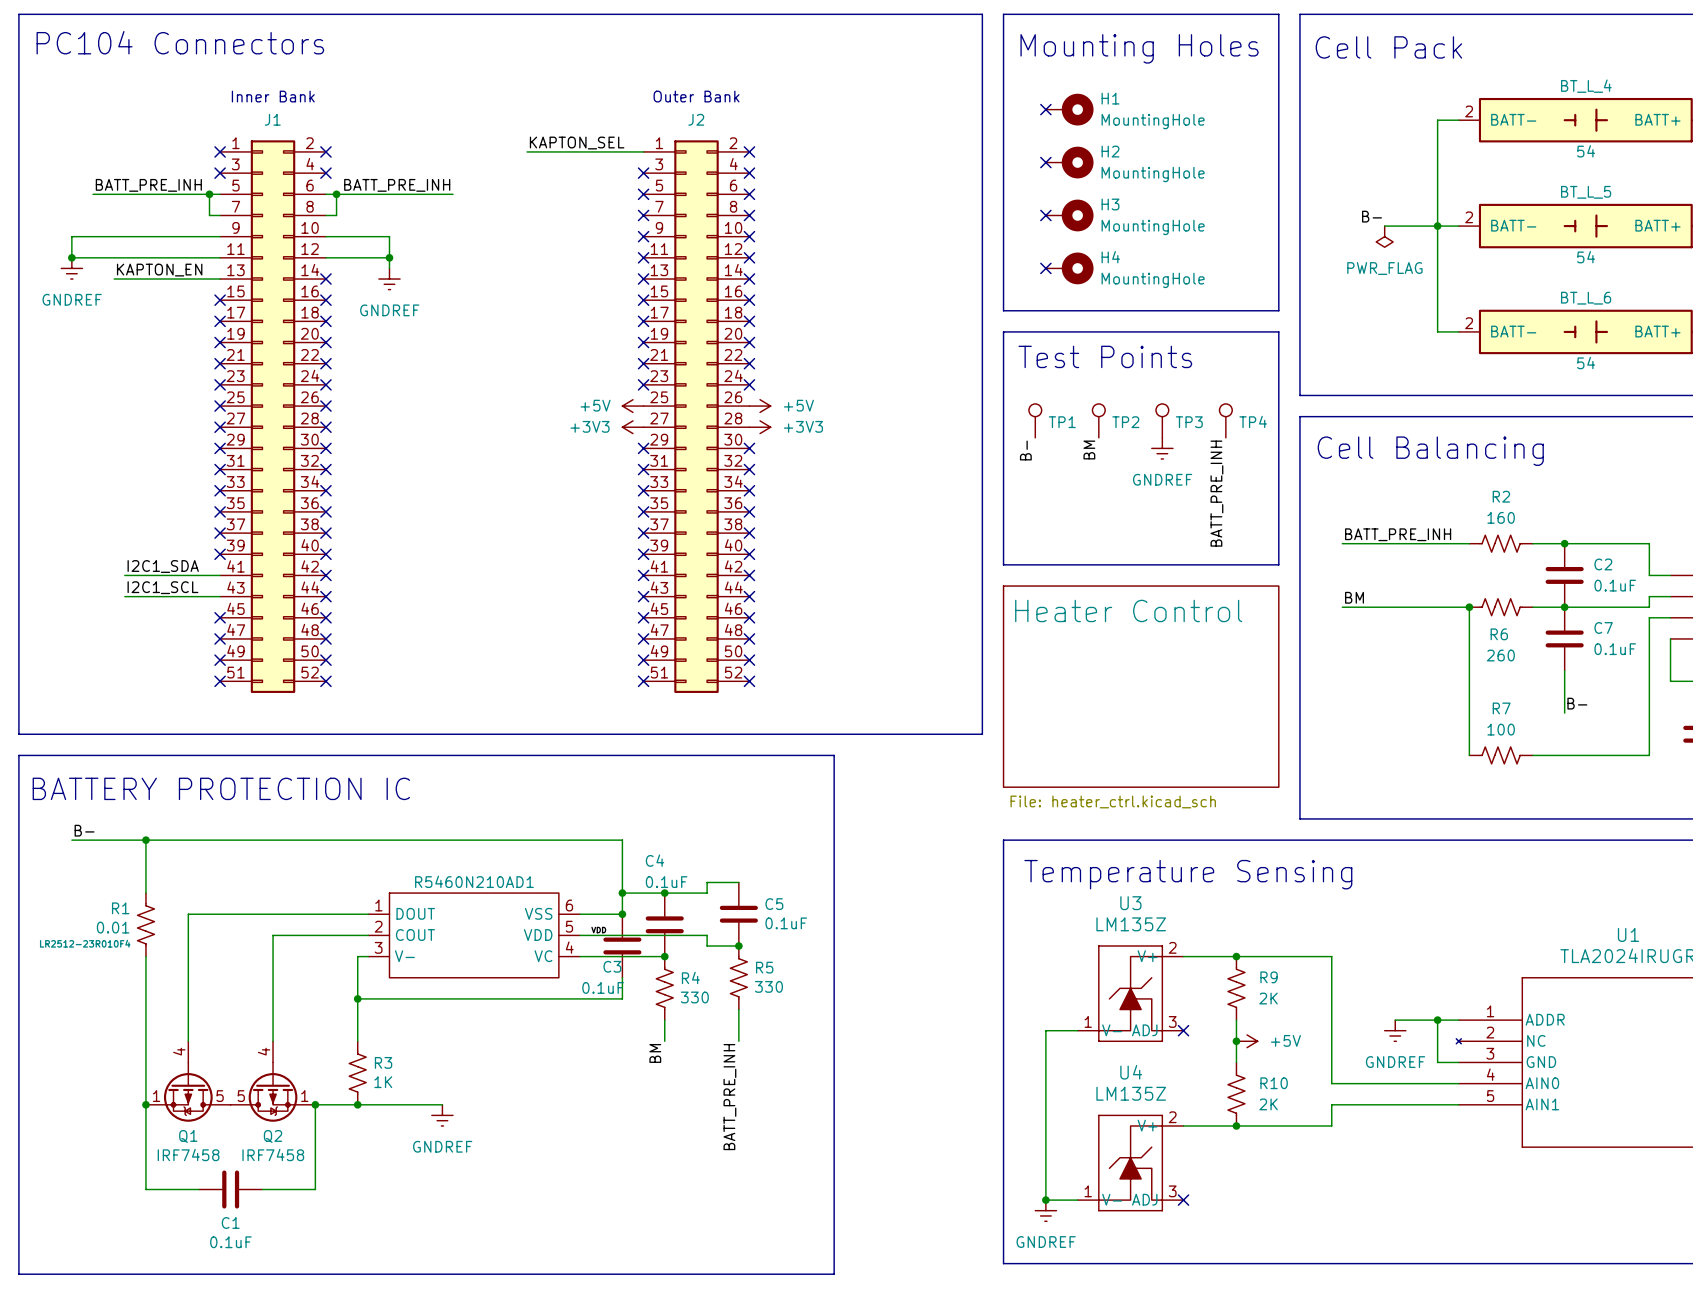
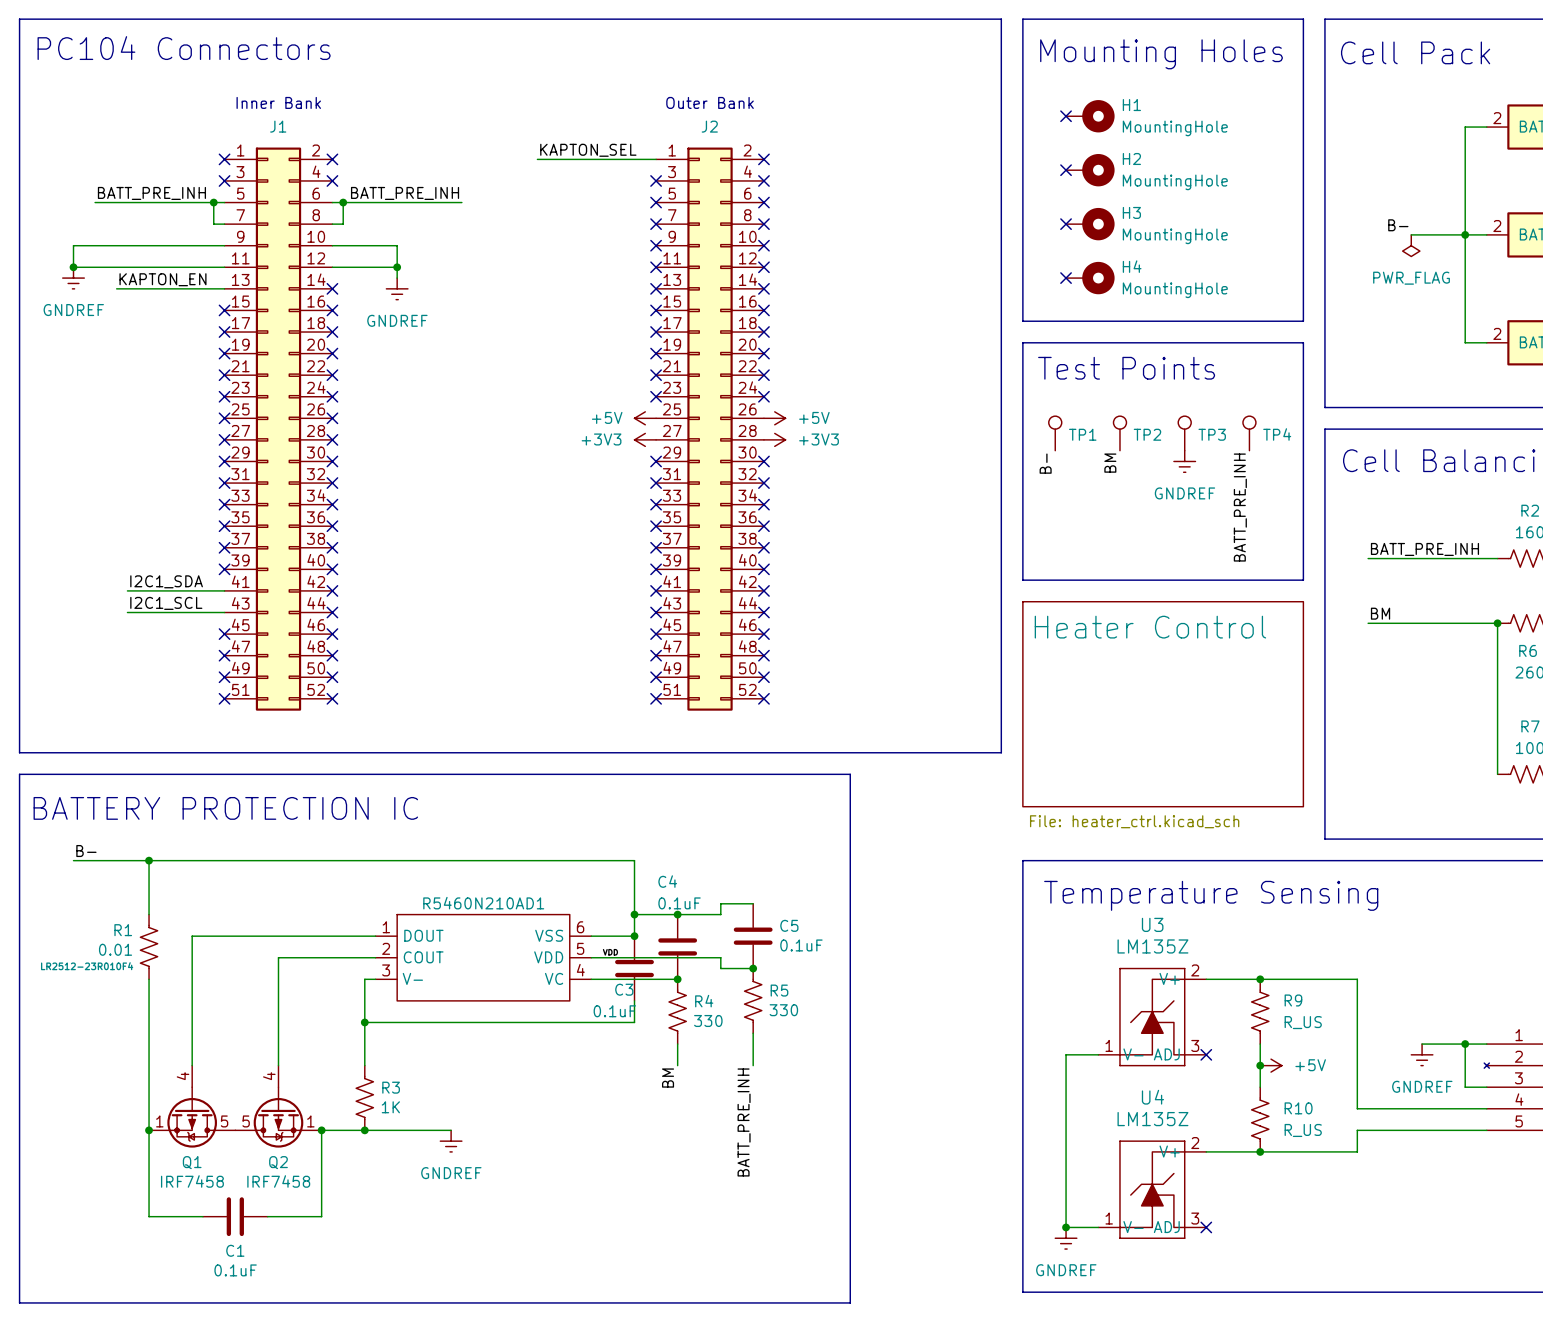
R9 value: 2K (1268, 998) -> R_US (1303, 1022)
R10 value: 2K (1268, 1104) -> R_US (1303, 1130)

